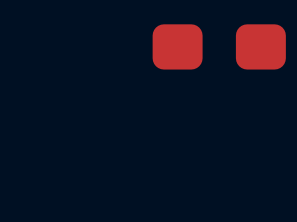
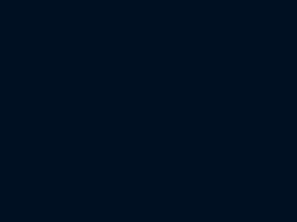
part: (219, 46) -> none

